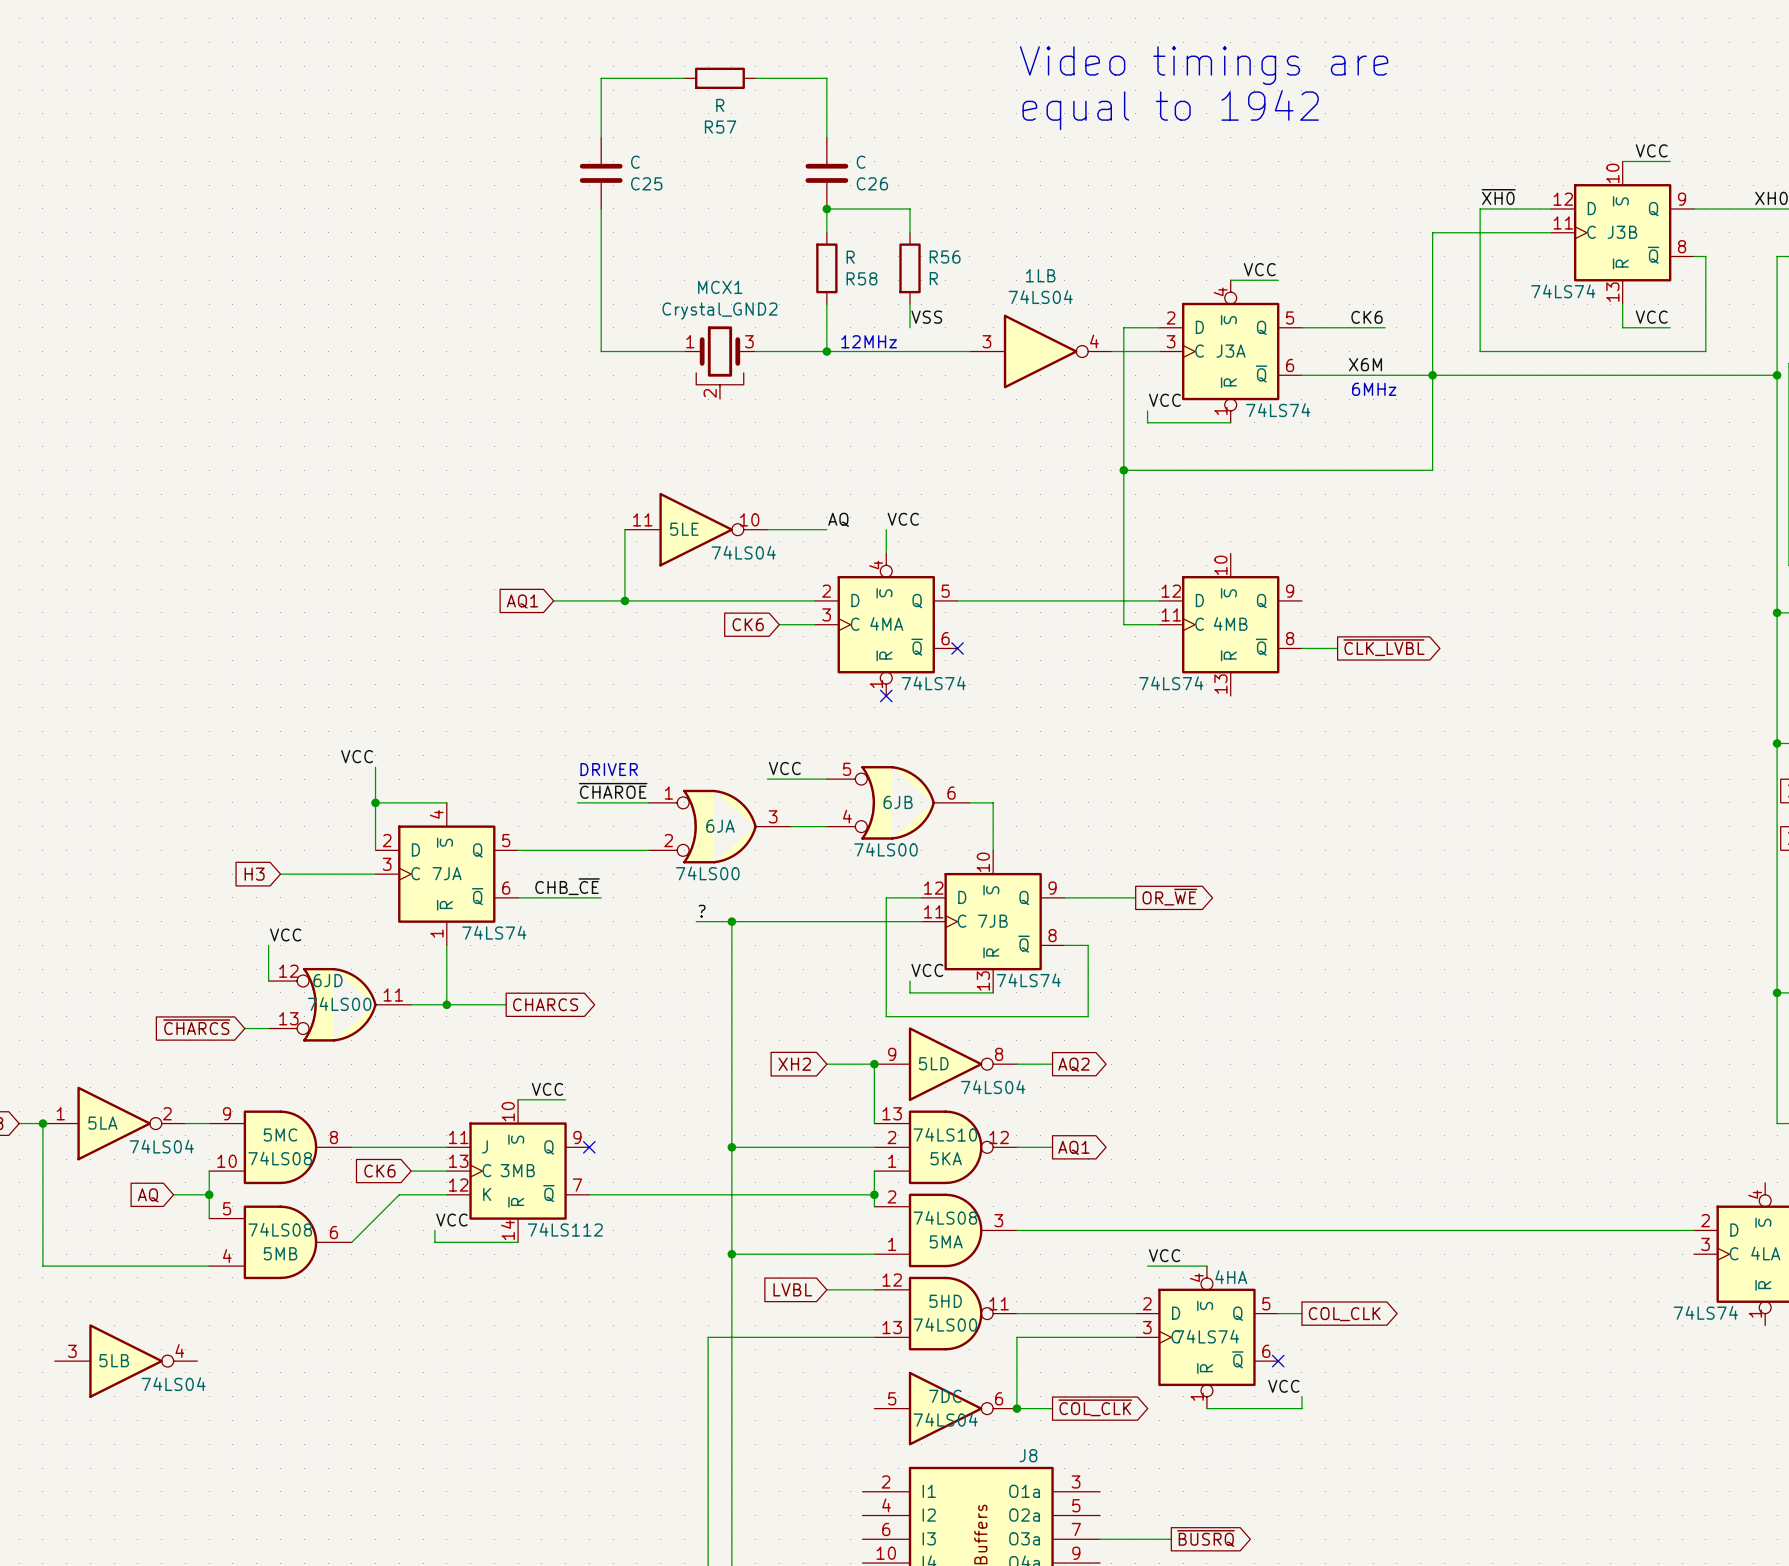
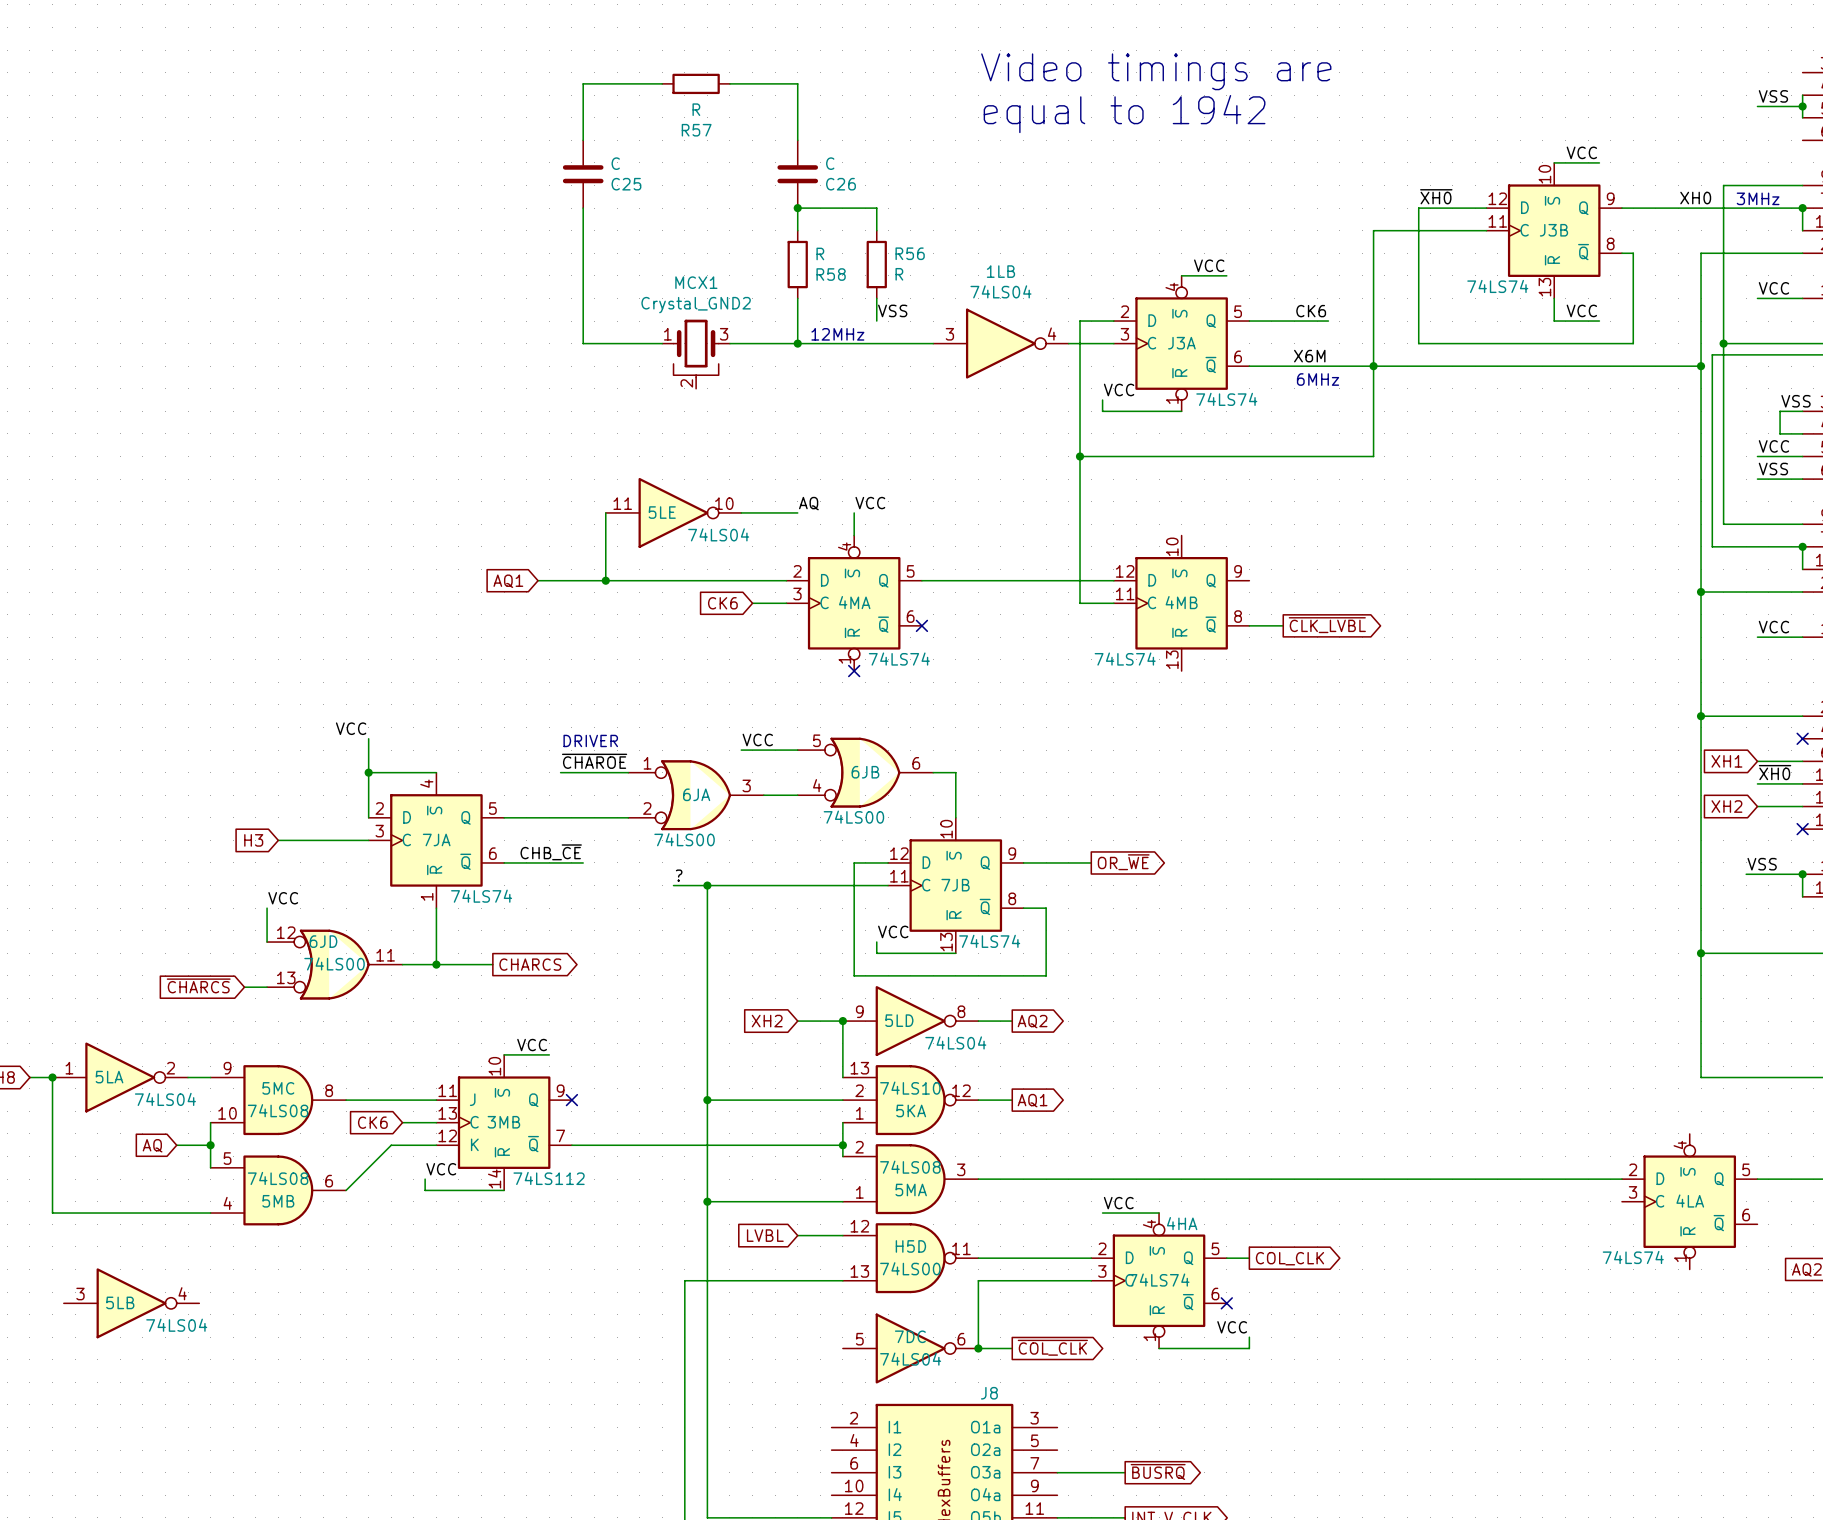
5HD name: 5HD (945, 1301) -> H5D (910, 1246)

